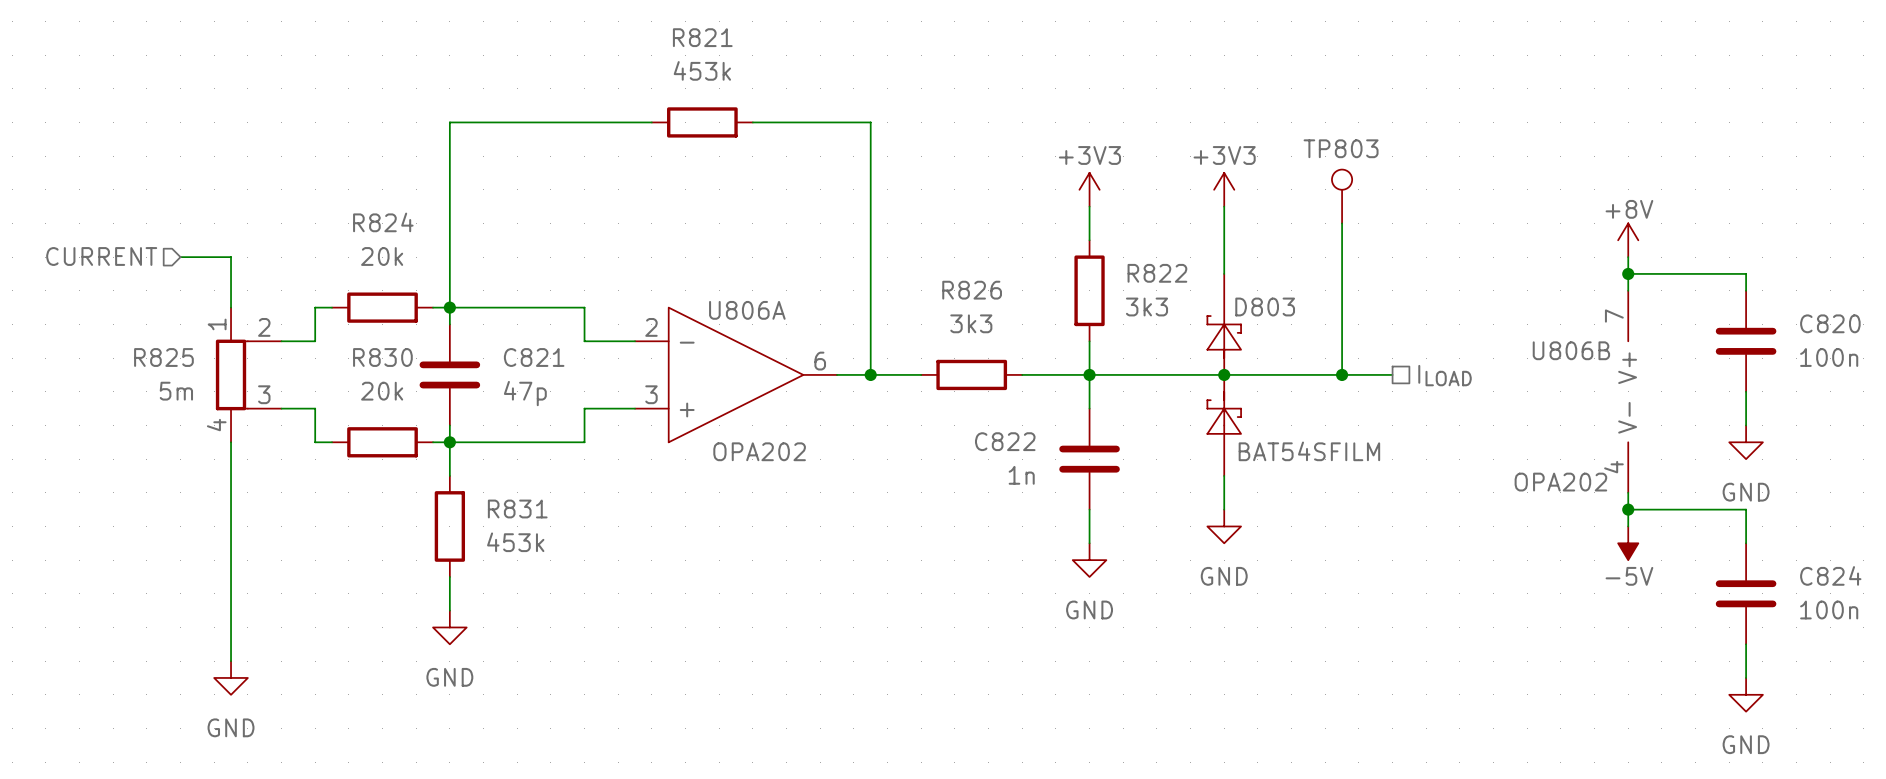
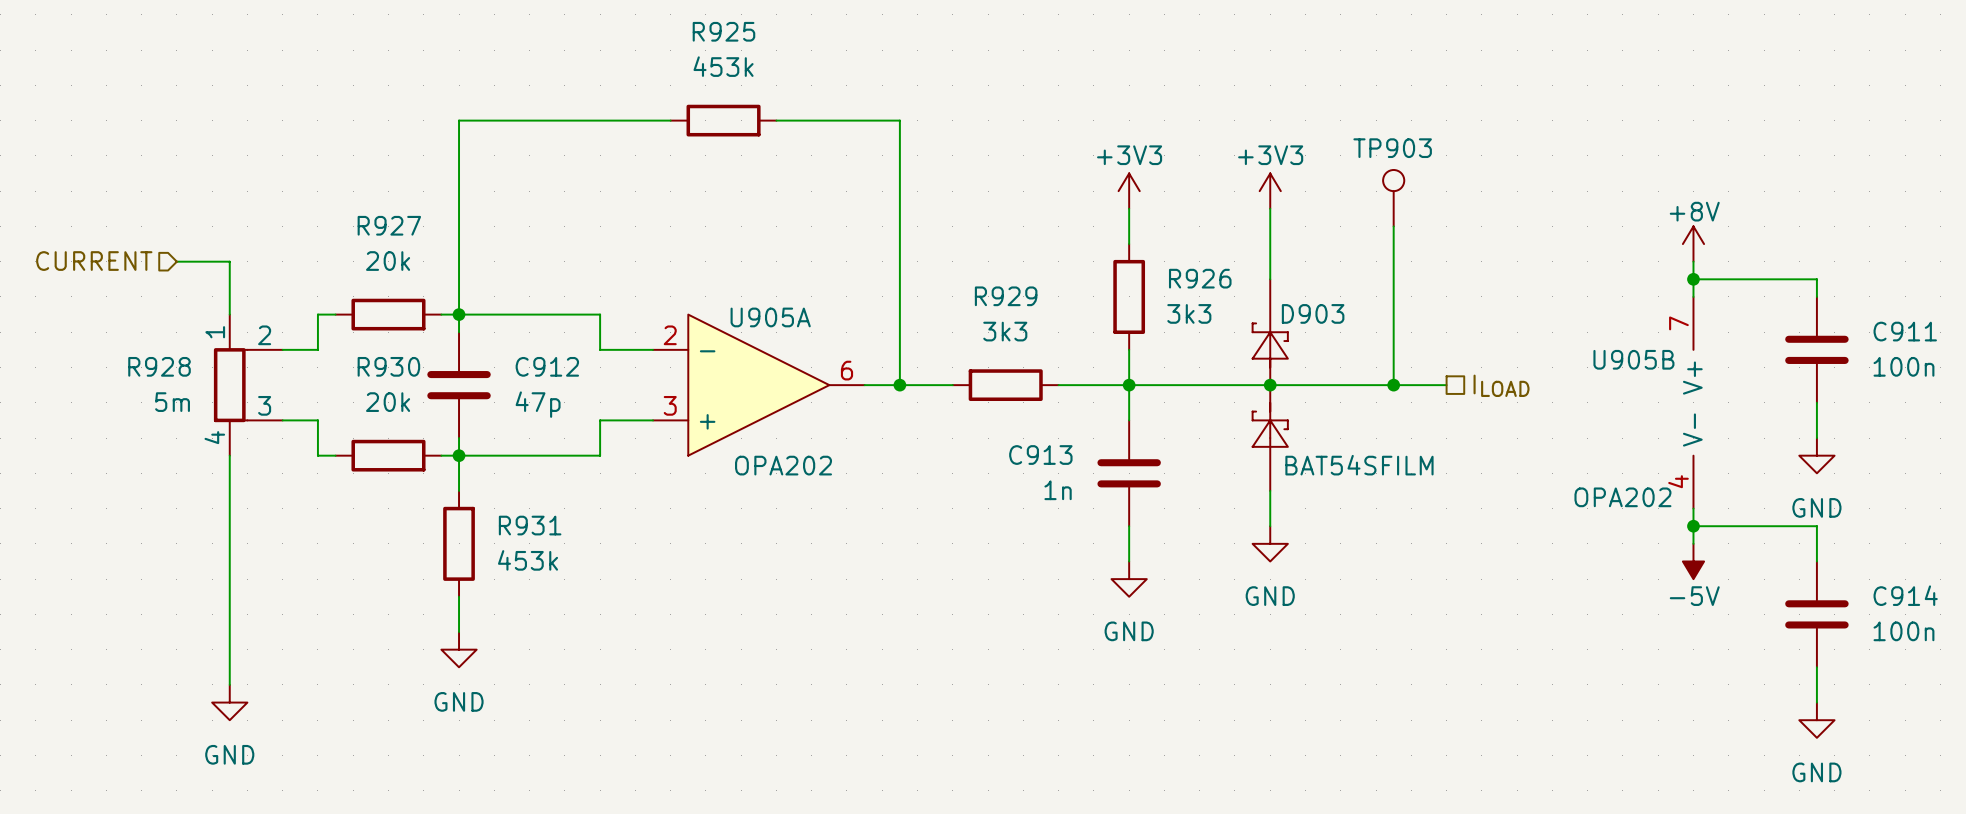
R821 name: R821 (702, 37) -> R925 (723, 31)
TP803 name: TP803 (1341, 148) -> TP903 (1392, 148)
R824 name: R824 (383, 222) -> R927 (389, 225)
R822 name: R822 (1157, 273) -> R926 (1200, 278)
R826 name: R826 (972, 290) -> R929 (1006, 296)
D803 name: D803 (1265, 306) -> D903 (1313, 313)
U806A name: U806A (747, 310) -> U905A (770, 317)
C820 name: C820 (1830, 323) -> C911 (1905, 331)
U806B name: U806B (1571, 350) -> U905B (1633, 359)
R825 name: R825 (163, 357) -> R928 (159, 366)
R830 name: R830 (382, 357) -> R930 (388, 366)
C821 name: C821 (534, 357) -> C912 (547, 366)
C822 name: C822 (1005, 441) -> C913 (1040, 455)
R831 name: R831 (517, 509) -> R931 (530, 525)
C824 name: C824 (1830, 575) -> C914 (1905, 595)

